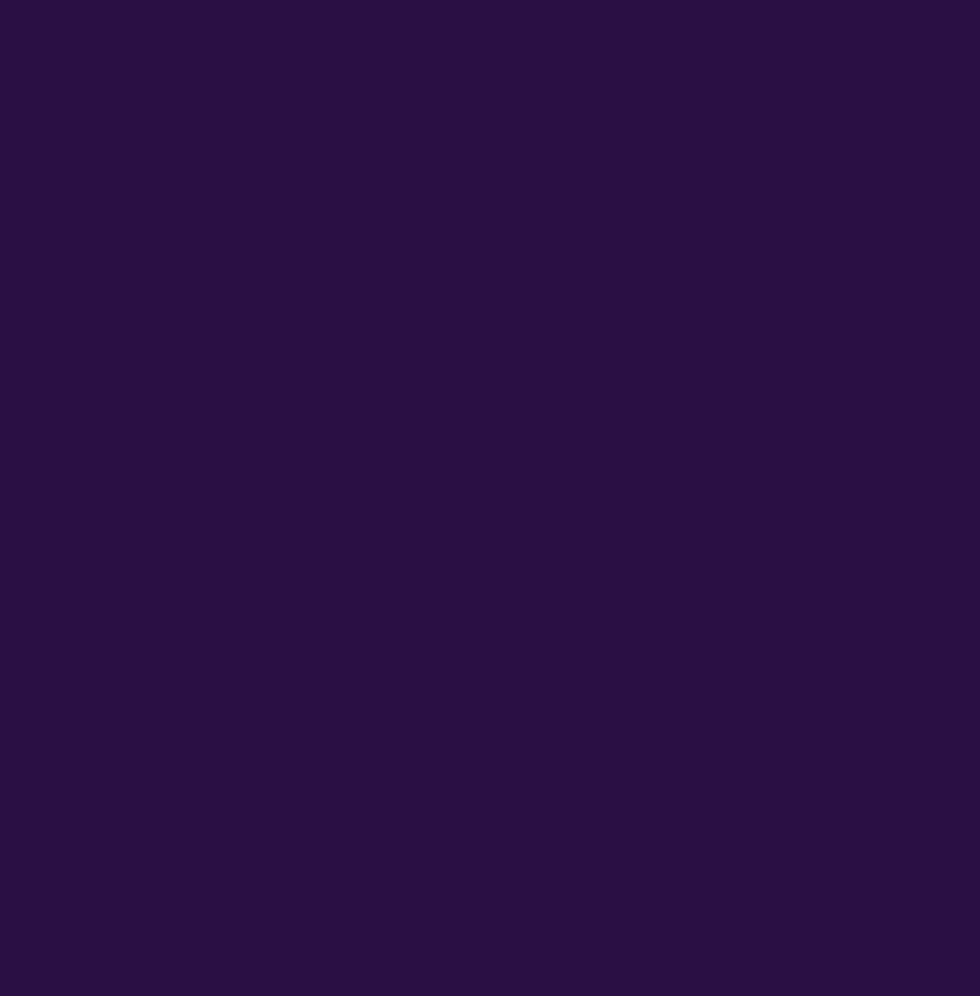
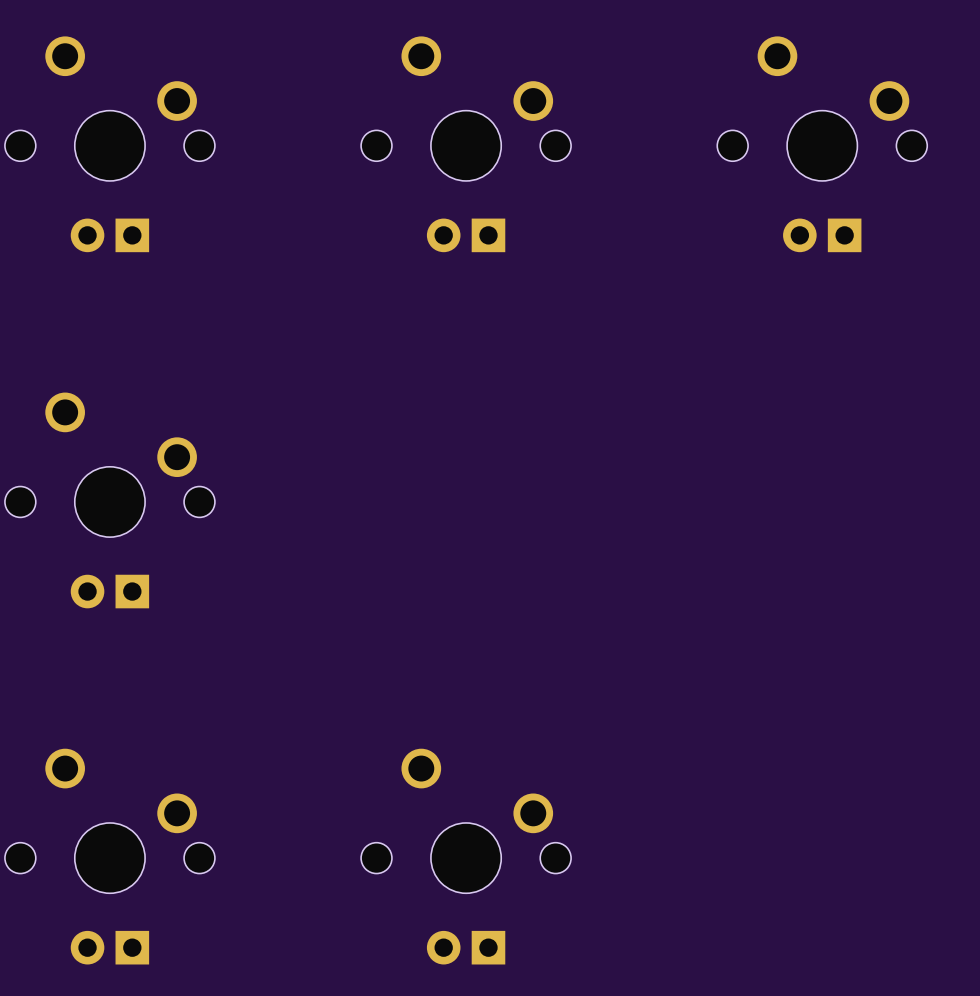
part: none -> (109, 144)
part: none -> (466, 144)
part: none -> (822, 144)
part: none -> (109, 500)
part: none -> (109, 856)
part: none -> (466, 856)

